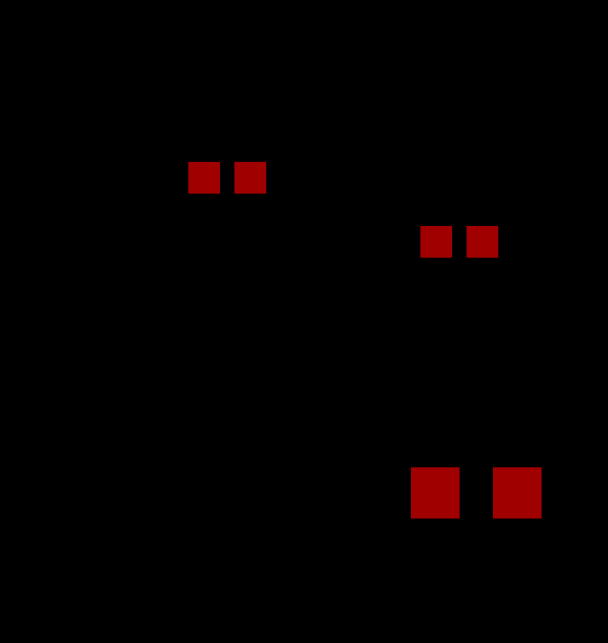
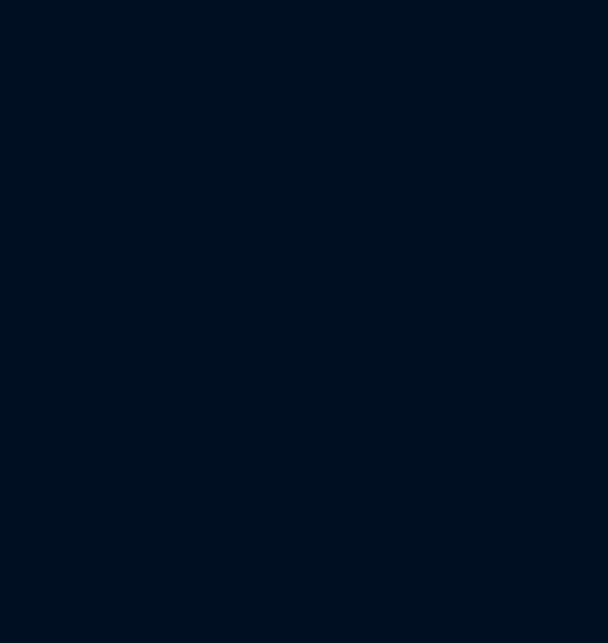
part: (227, 177) -> none
part: (459, 241) -> none
part: (476, 492) -> none

